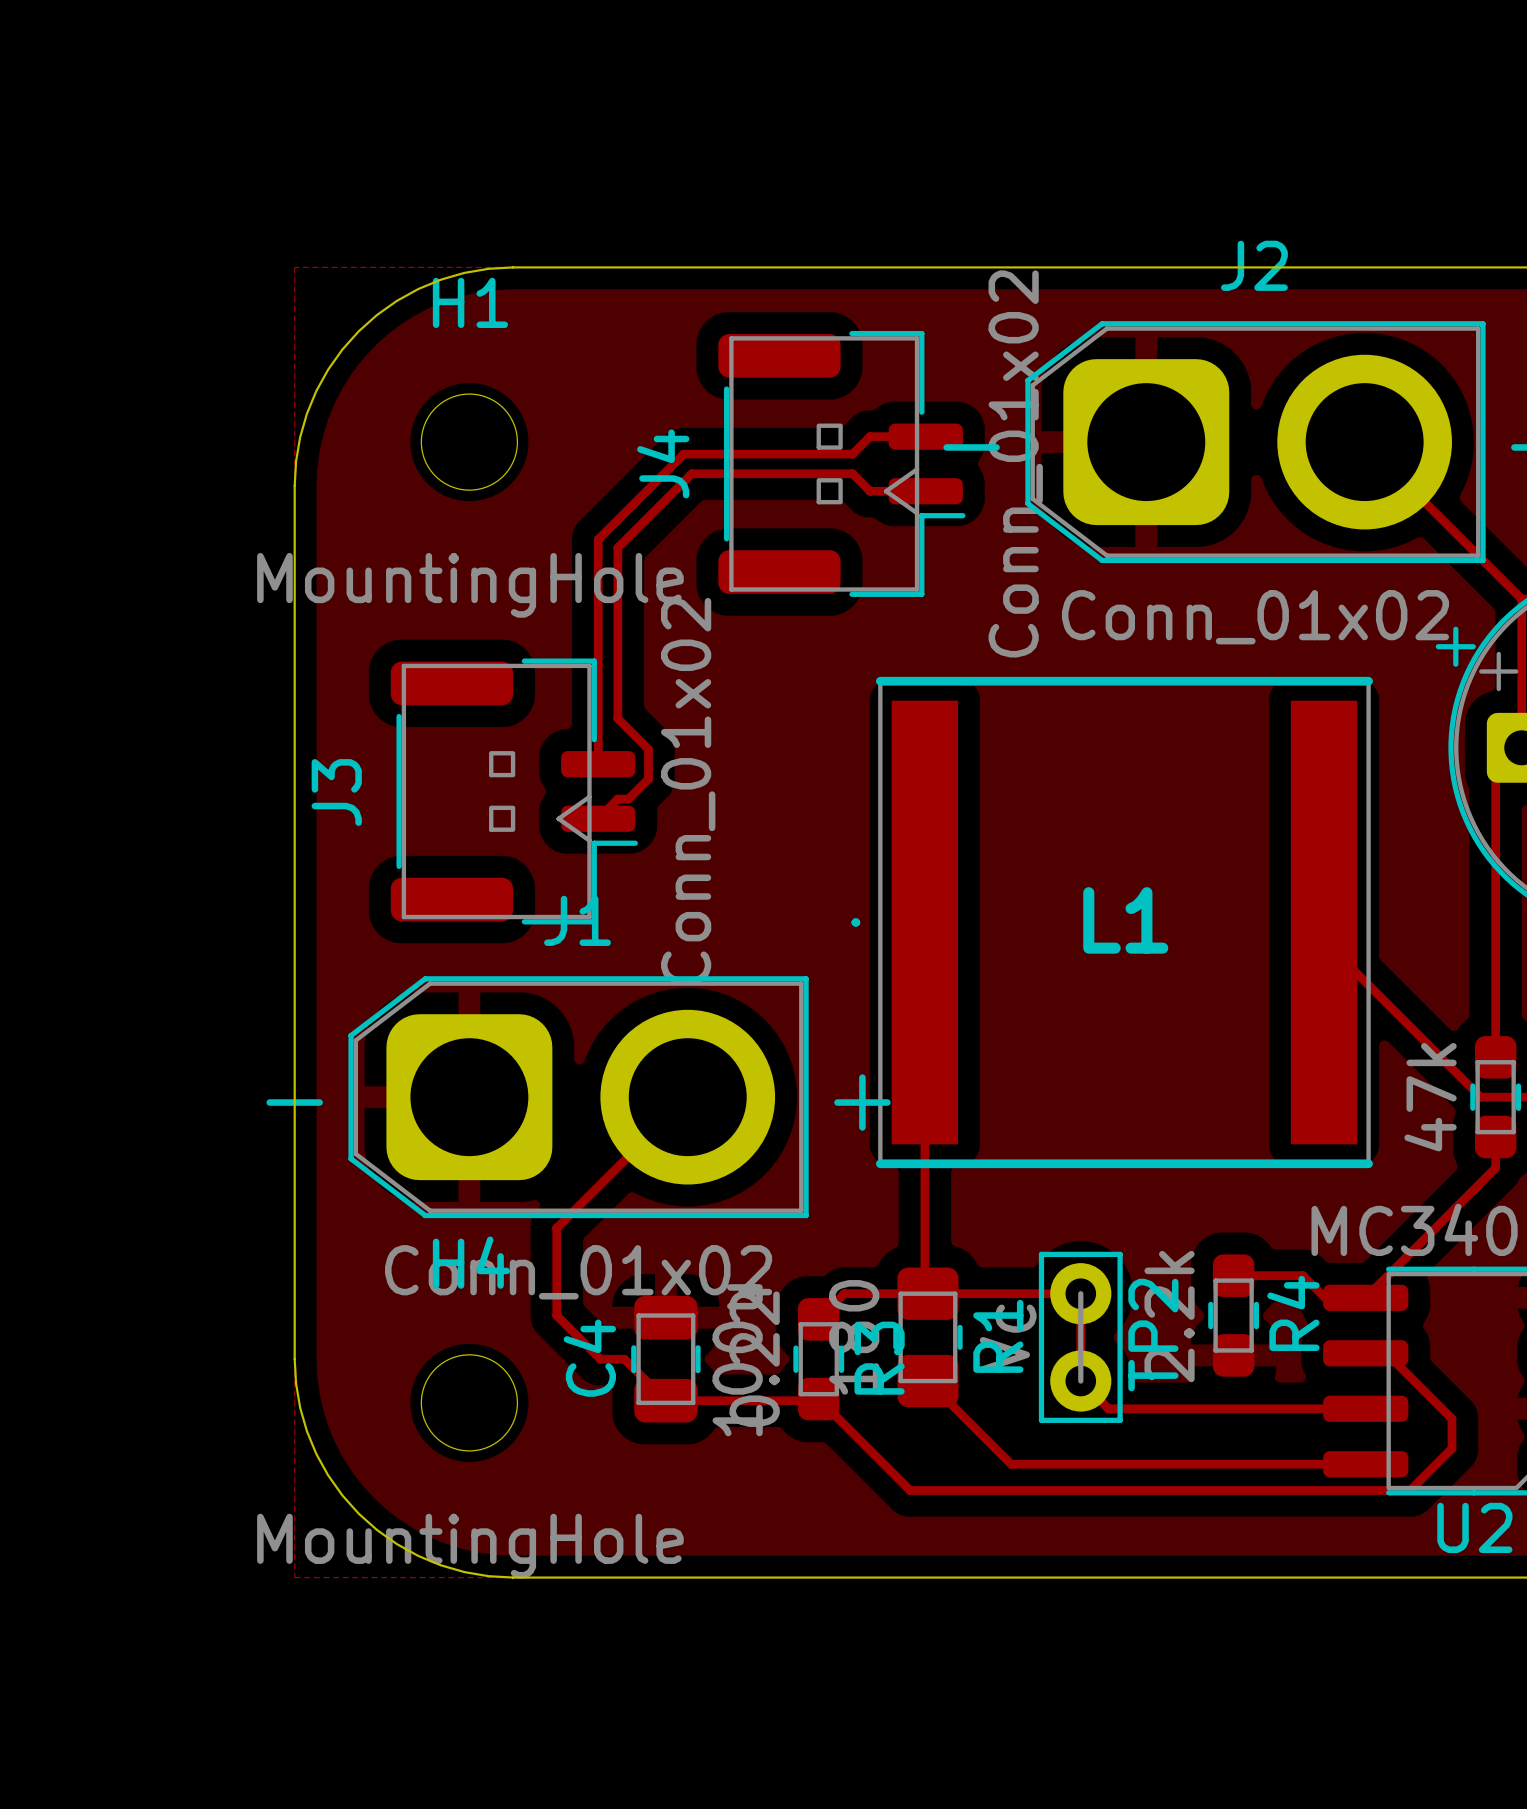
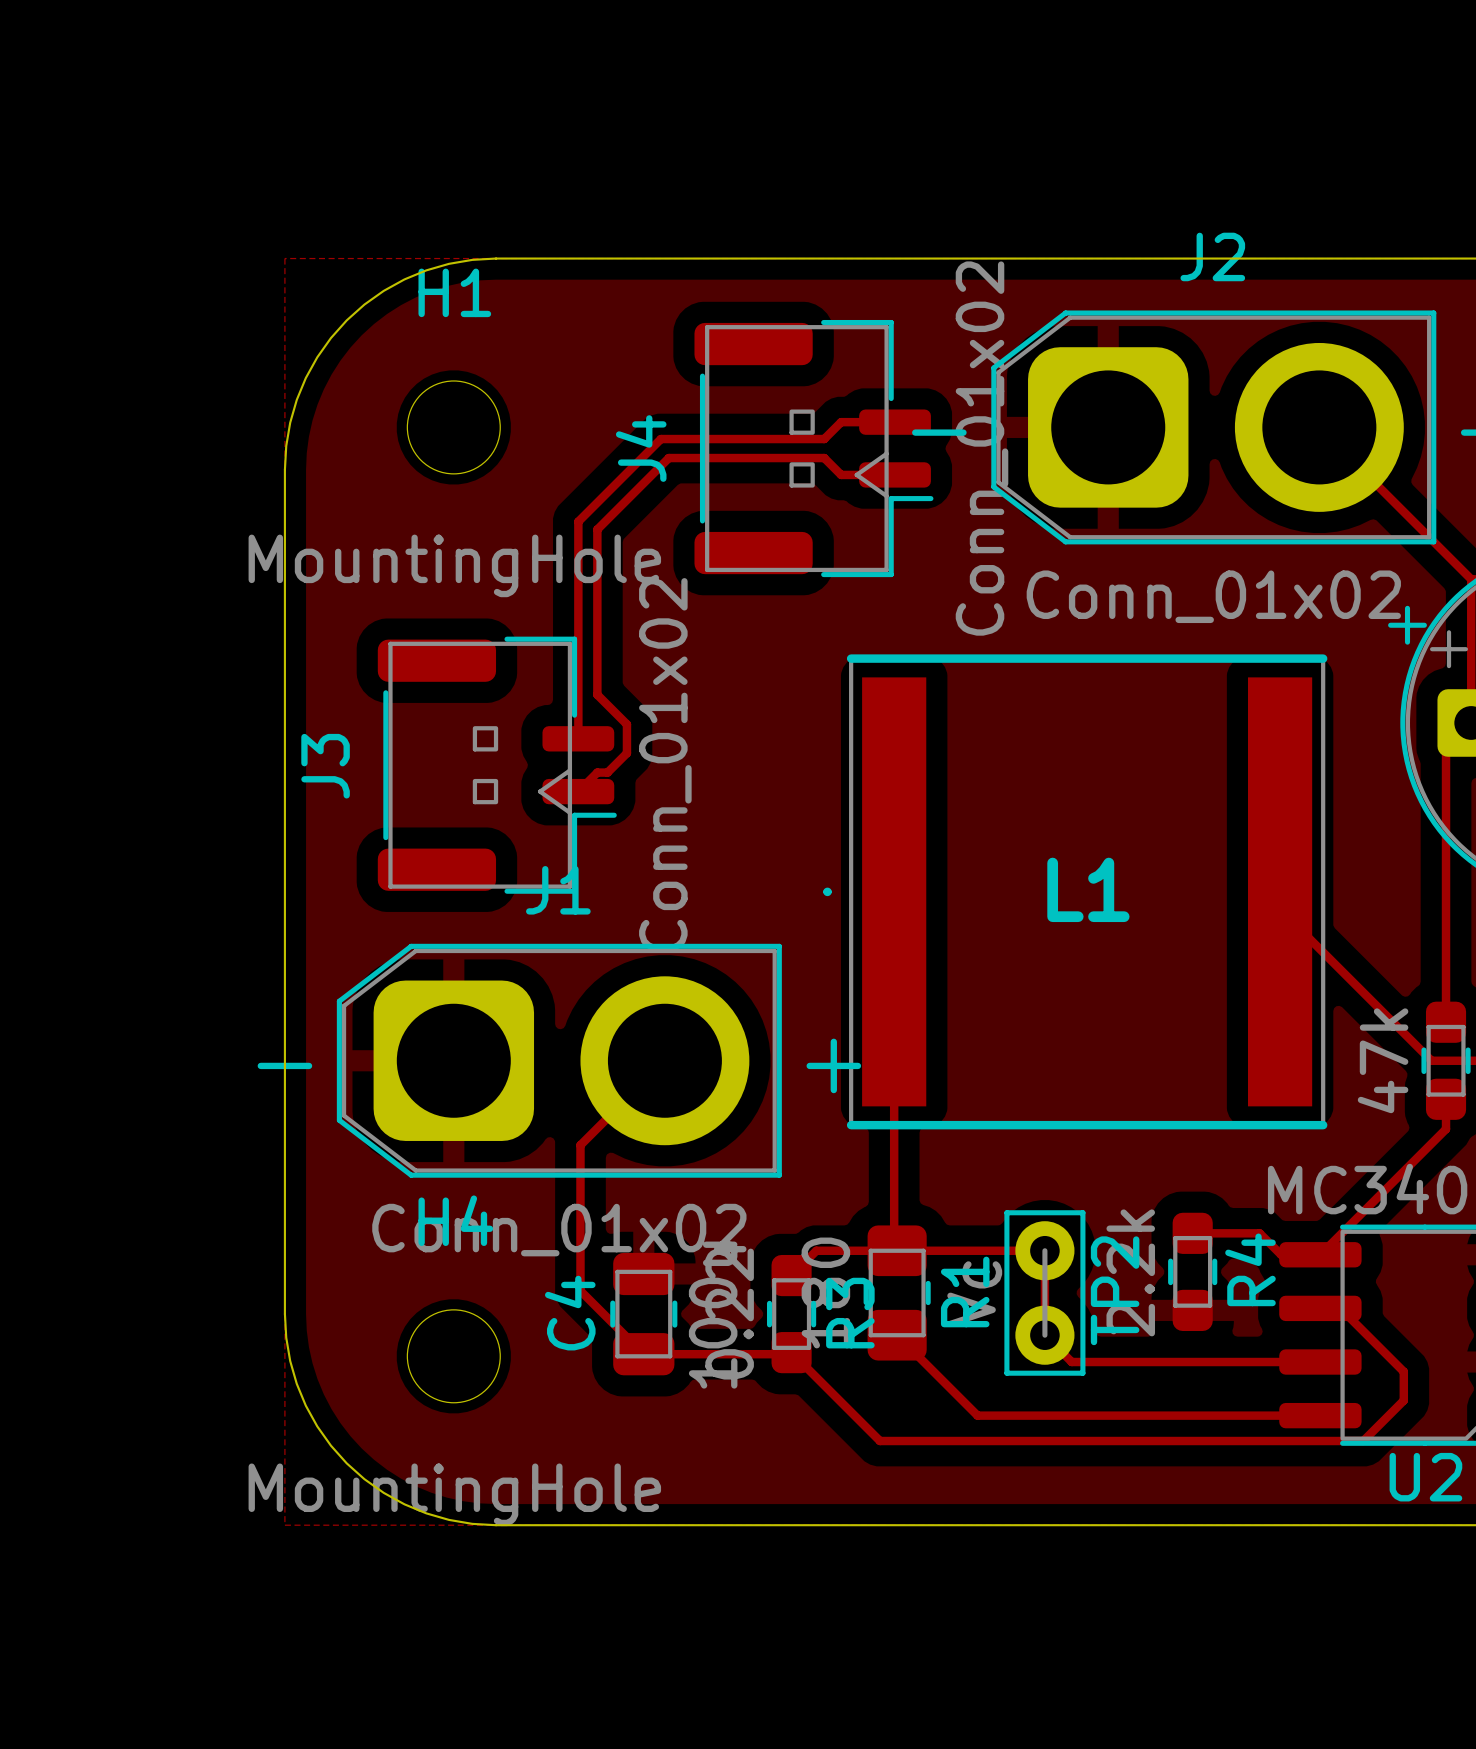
track: (600, 1184) (556, 1228) (556, 1315) (600, 1359) (624, 1359) -> (580, 1145) (580, 1290) (603, 1314)

